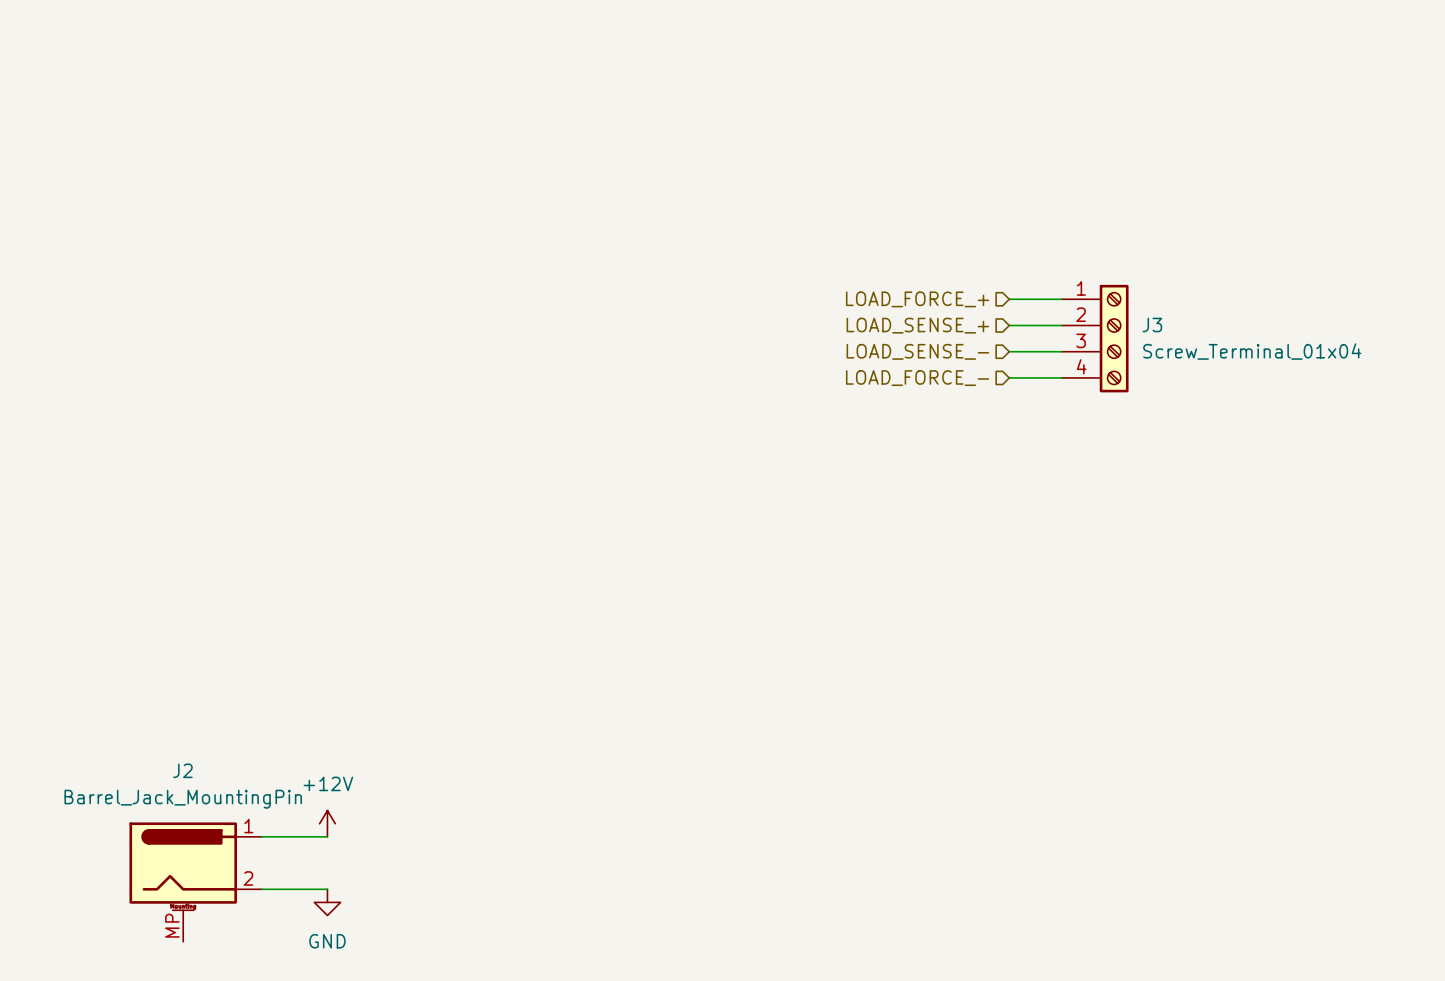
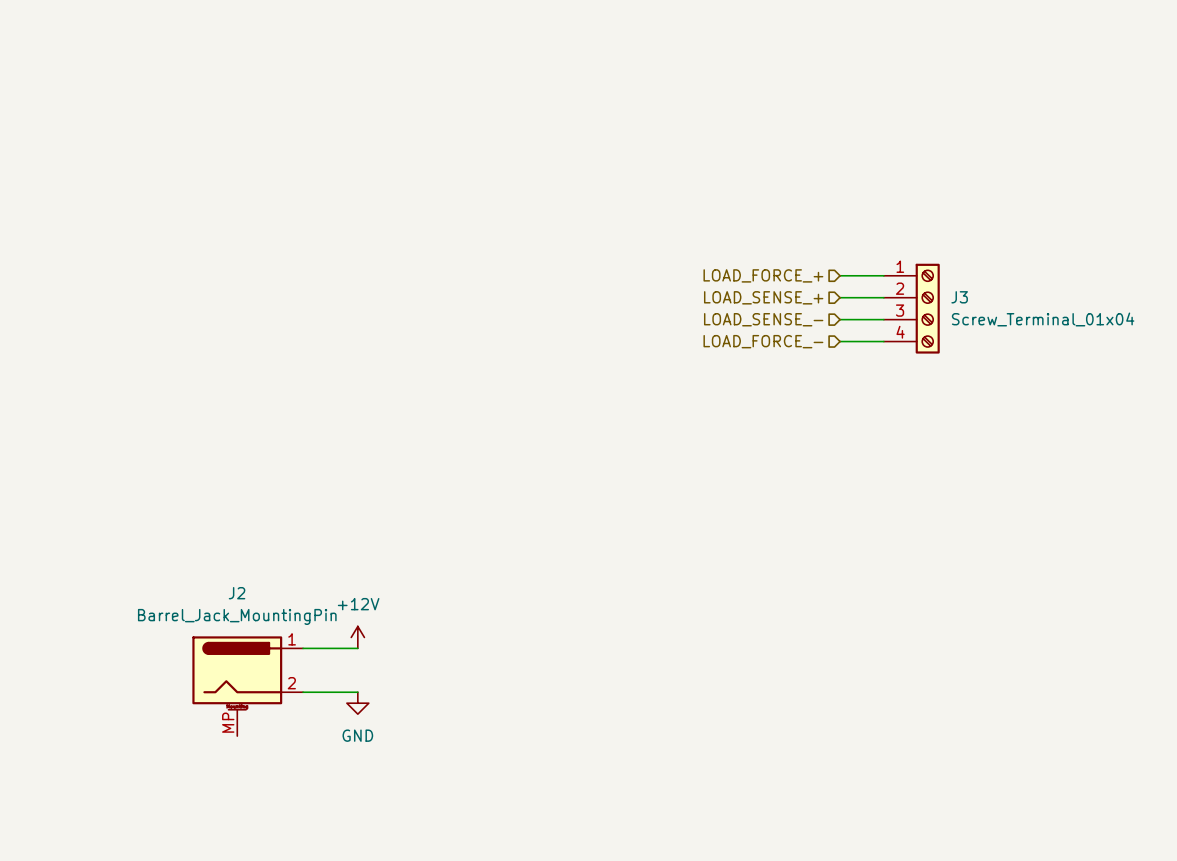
power symbol position: +12V (327, 823) -> +12V (357, 637)
wire: (261, 836) (327, 836) -> (303, 648) (357, 648)
J2 position: (195, 882) -> (247, 686)
wire: (261, 889) (327, 889) -> (303, 692) (357, 692)
power symbol position: GND (327, 902) -> GND (357, 703)

